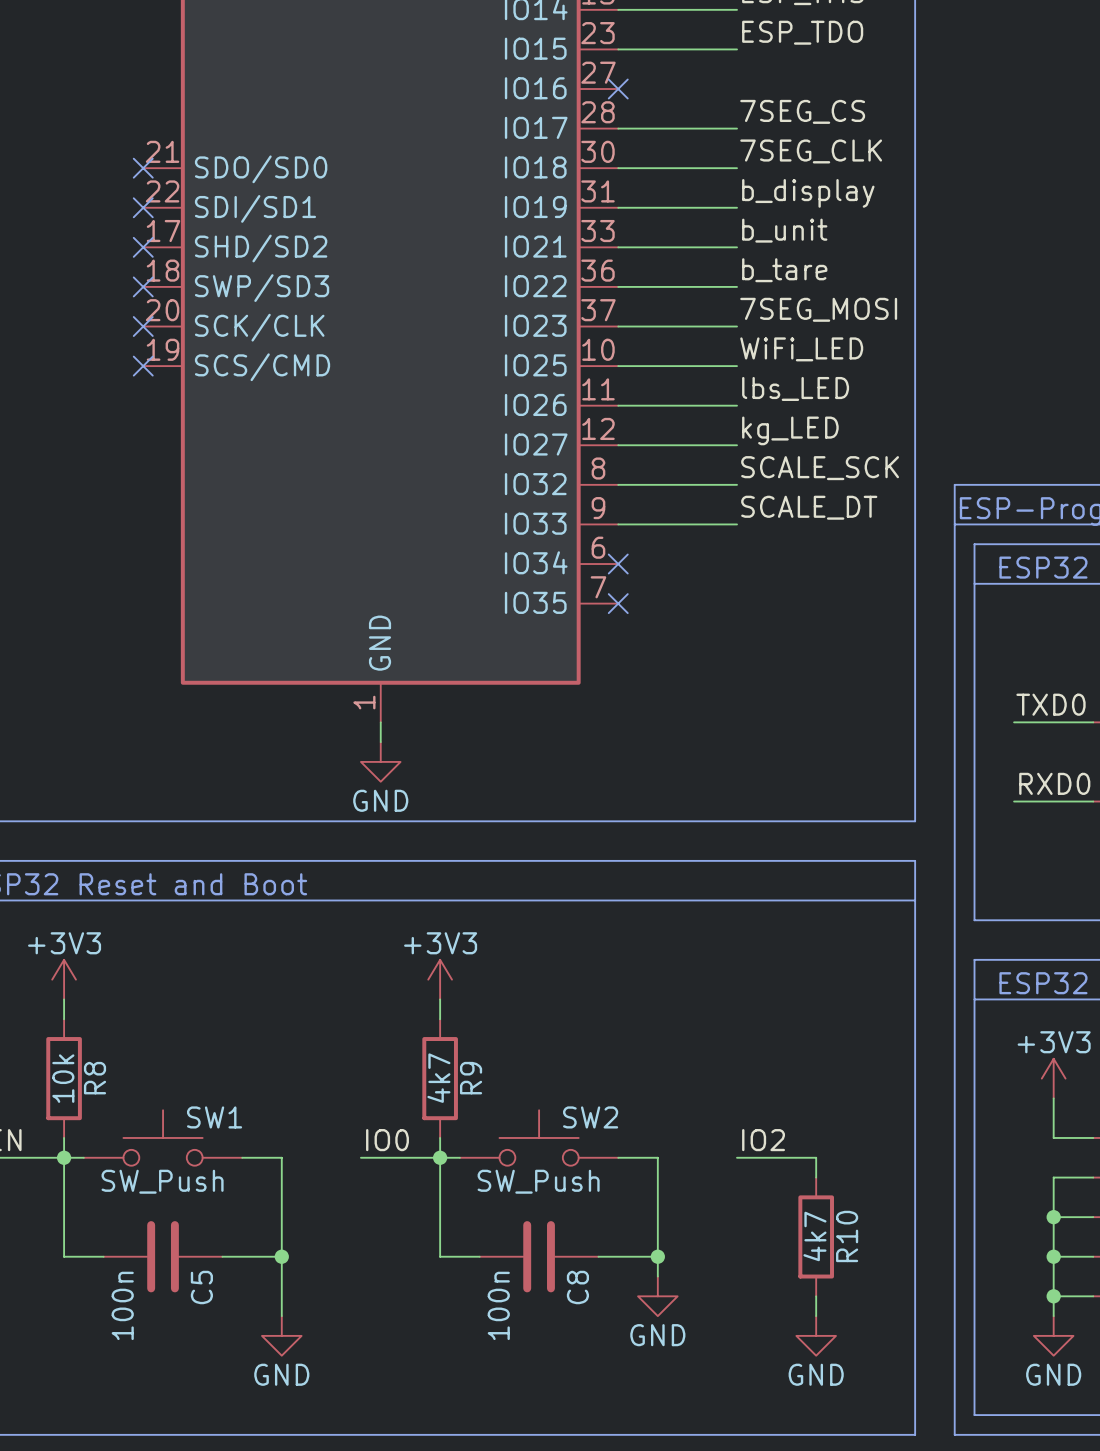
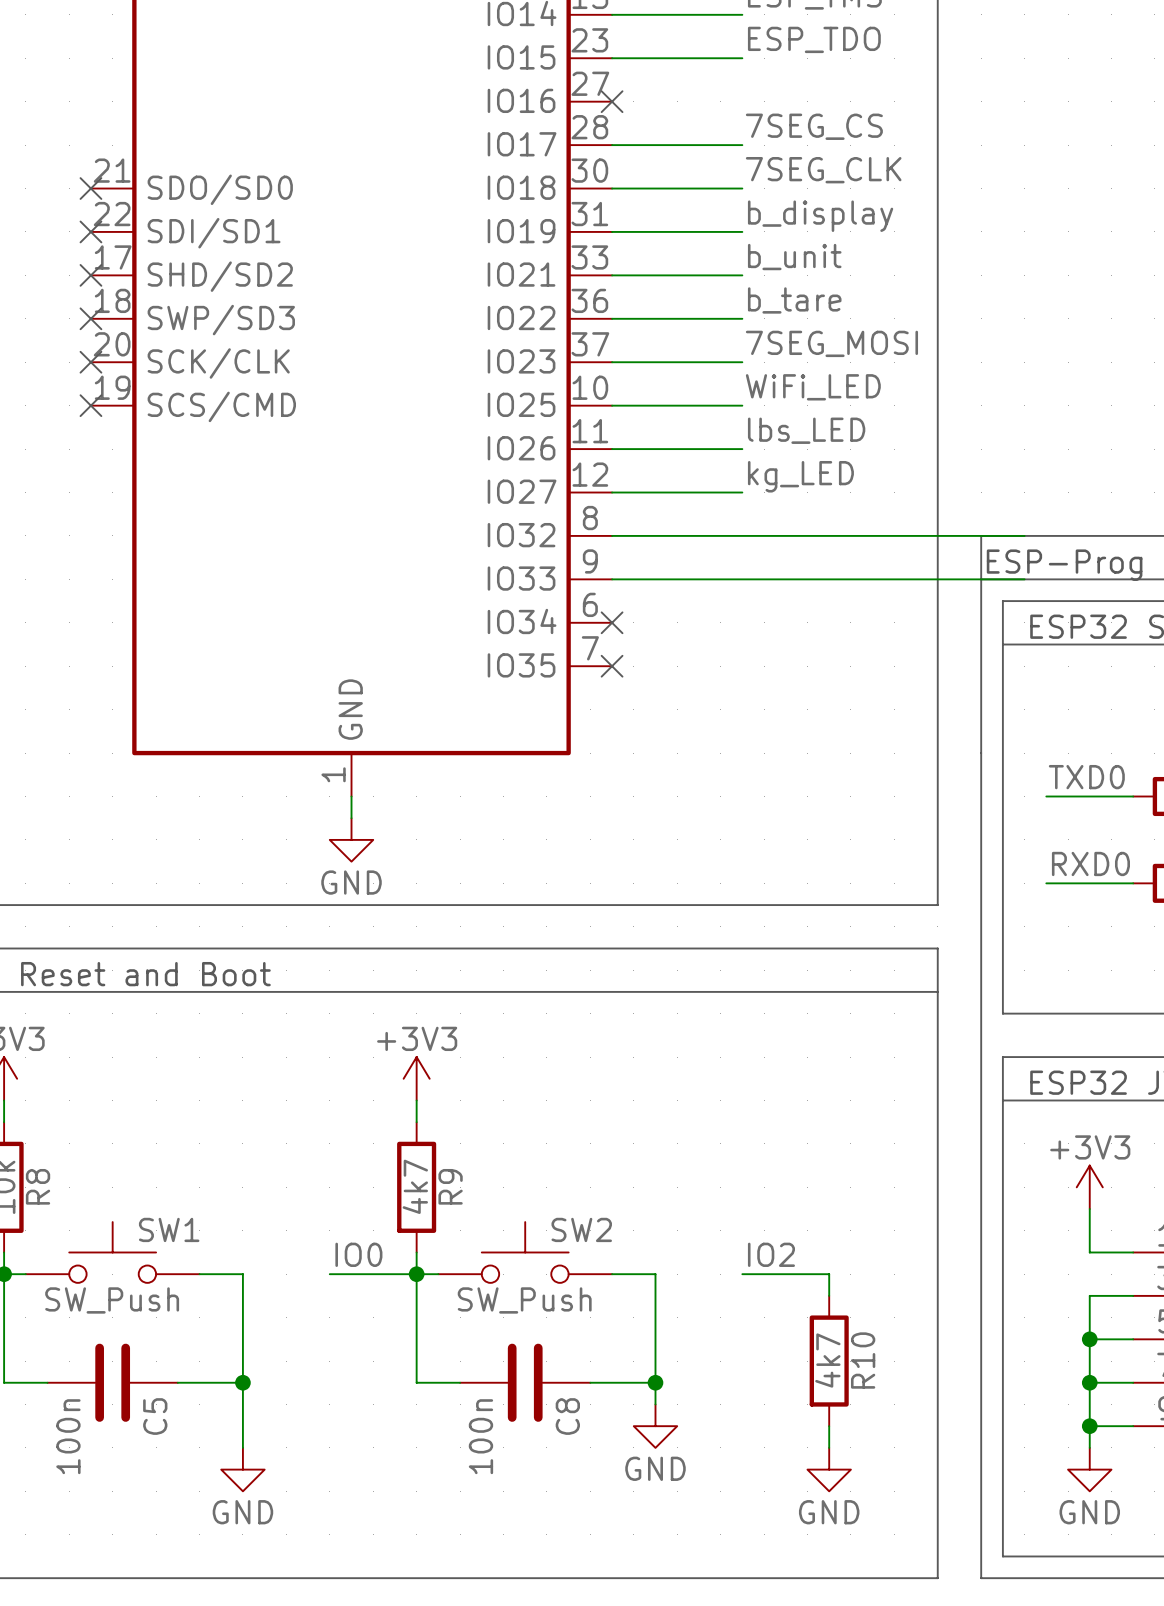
label: SCALE_SCK (820, 468) -> none
wire: none -> (742, 535) (1024, 535)
label: SCALE_DT (809, 507) -> none
wire: none -> (742, 579) (1024, 579)

